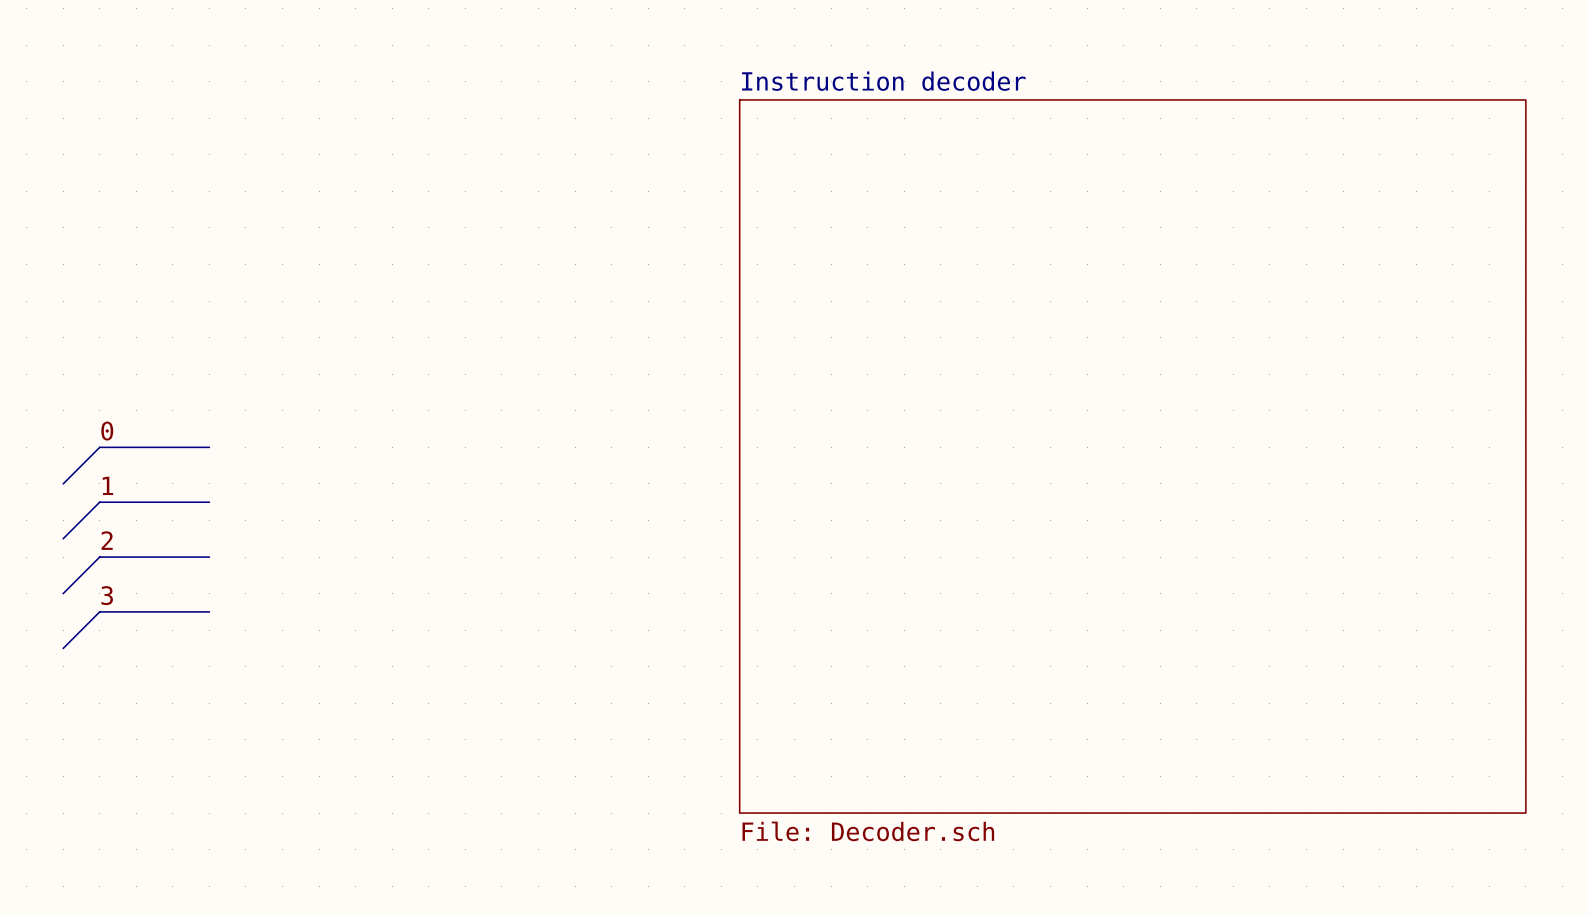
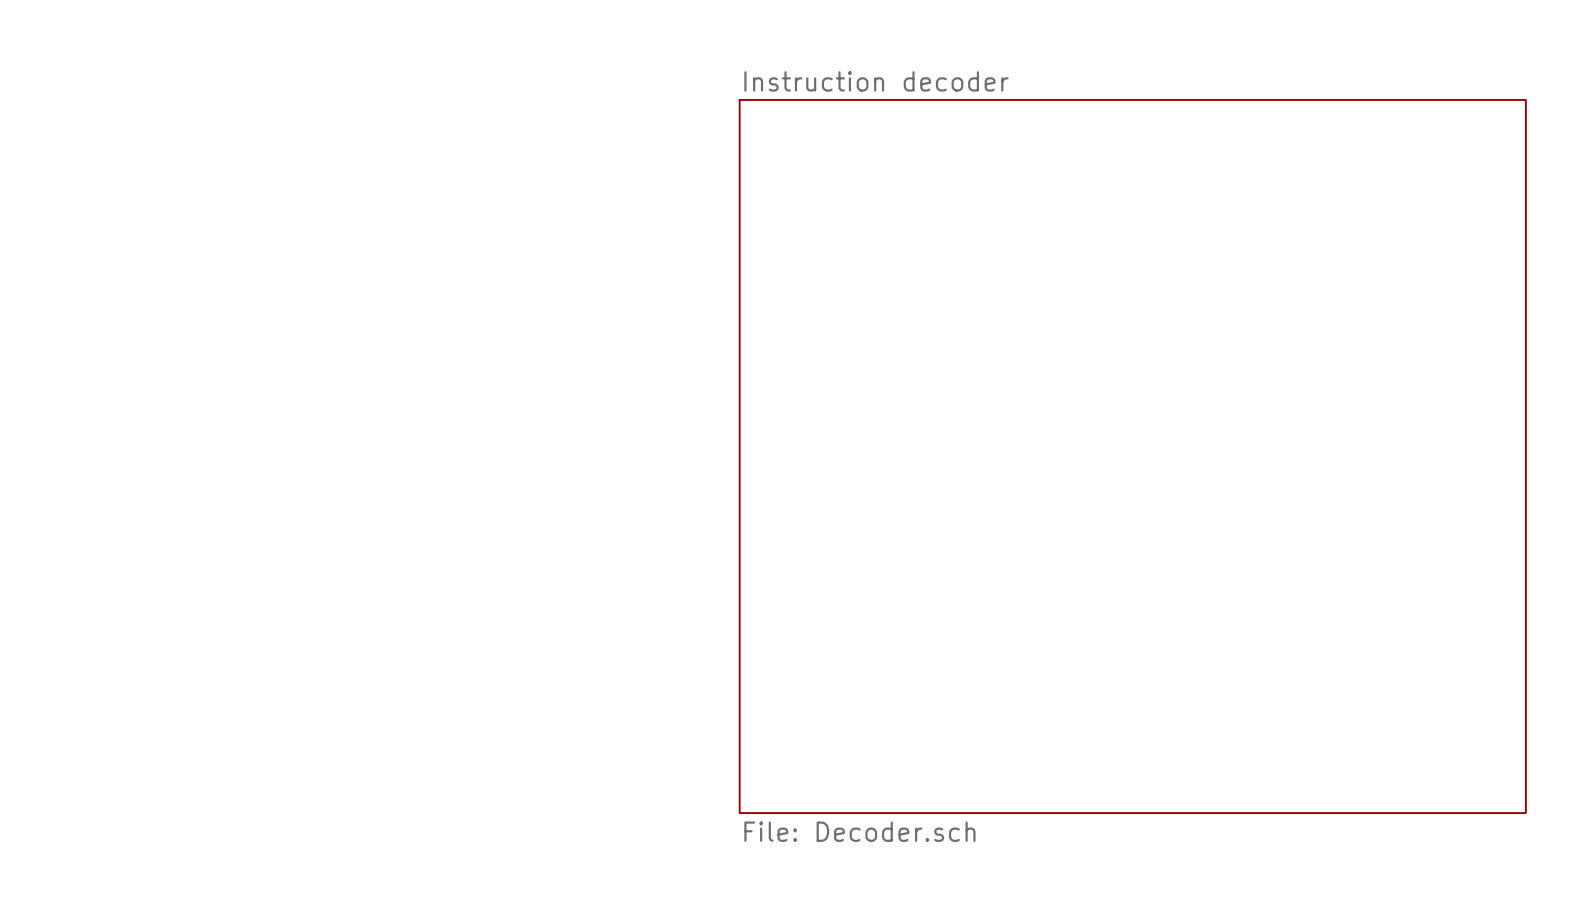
label: 0 (107, 431) -> none
wire: (209, 447) (99, 447) (63, 483) -> none
label: 1 (107, 485) -> none
wire: (209, 502) (99, 502) (63, 538) -> none
label: 2 (107, 540) -> none
wire: (209, 557) (99, 557) (63, 593) -> none
label: 3 (107, 595) -> none
wire: (209, 611) (99, 611) (63, 648) -> none

